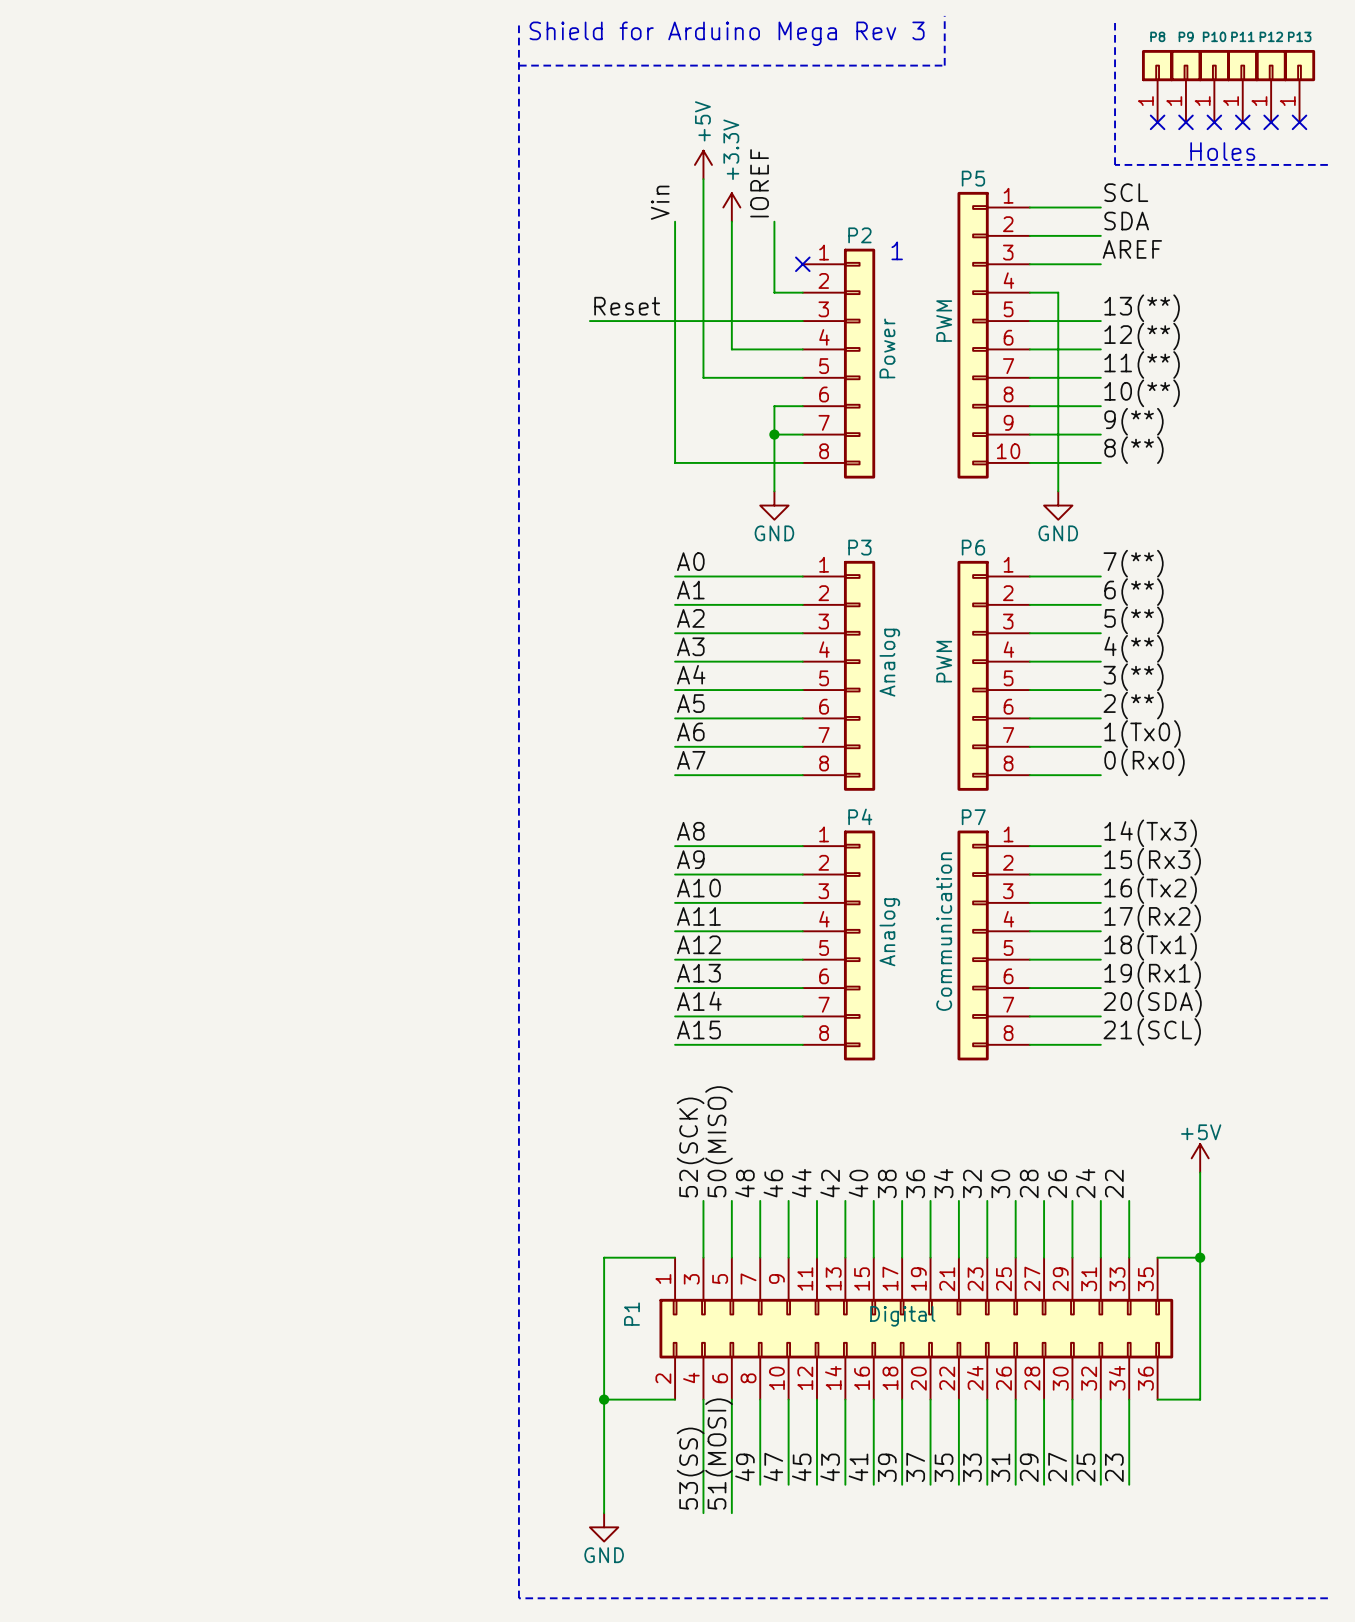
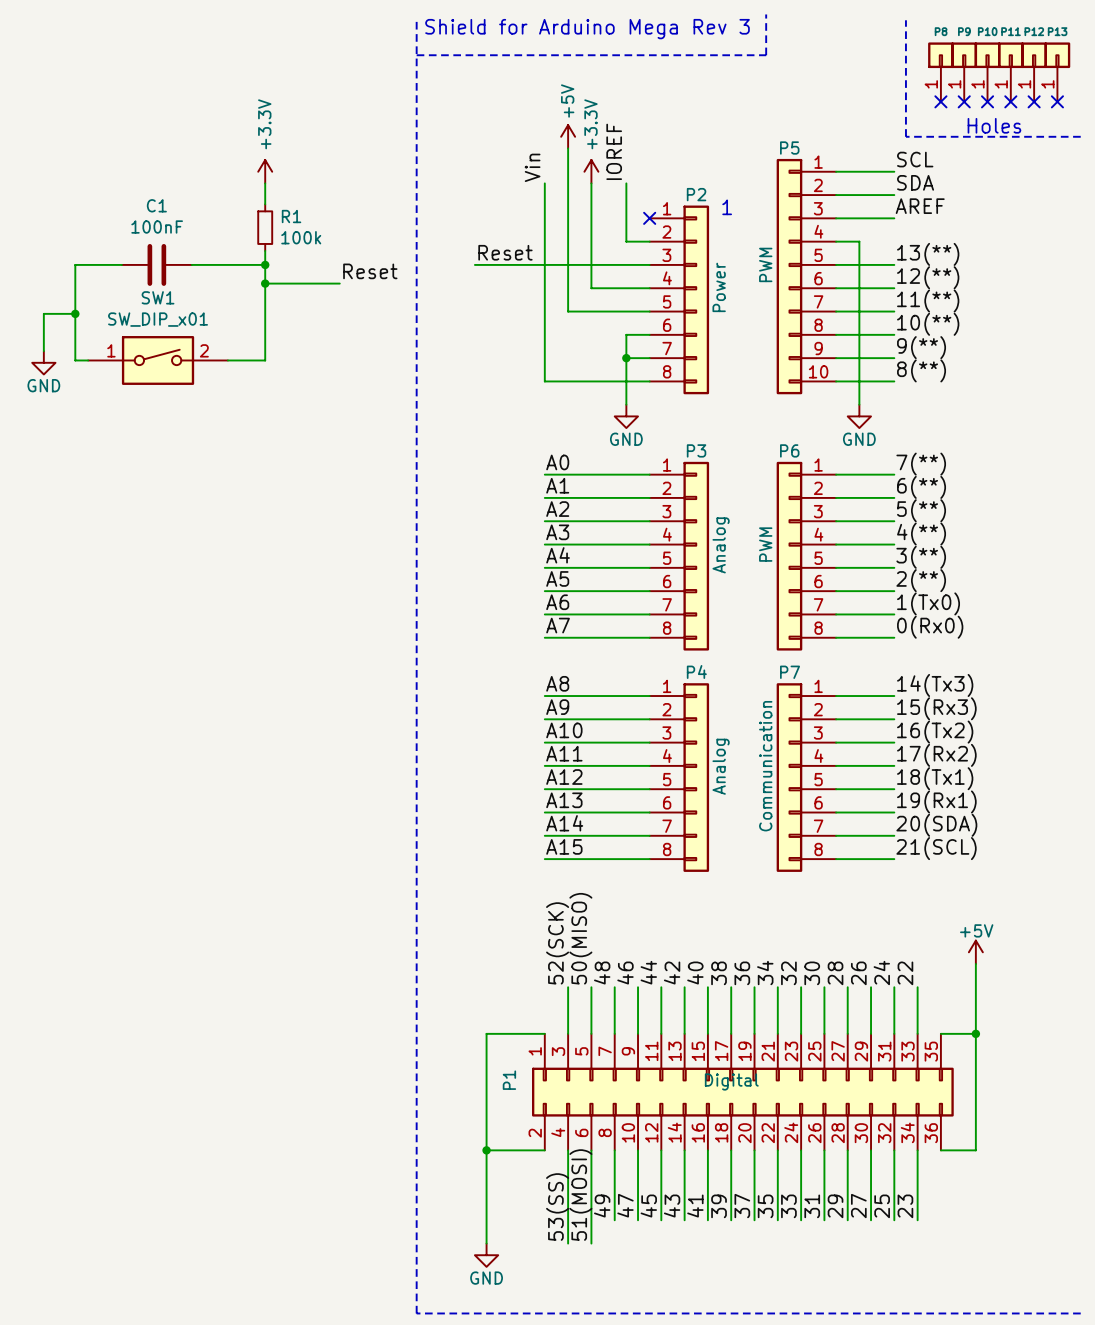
power symbol: none -> +3.3V (265, 171)
wire: none -> (265, 183) (265, 204)
R1: none -> 100k (265, 227)
wire: none -> (265, 250) (265, 360) (227, 360)
wire: none -> (121, 264) (75, 264) (75, 360) (88, 360)
C1: none -> 100nF (156, 264)
wire: none -> (191, 264) (265, 264)
junction: none -> (265, 264)
label: none -> Reset (370, 271)
wire: none -> (265, 283) (339, 283)
junction: none -> (265, 283)
wire: none -> (75, 313) (43, 313) (43, 351)
junction: none -> (75, 313)
SW1: none -> SW_DIP_x01 (158, 360)
power symbol: none -> GND (43, 362)

